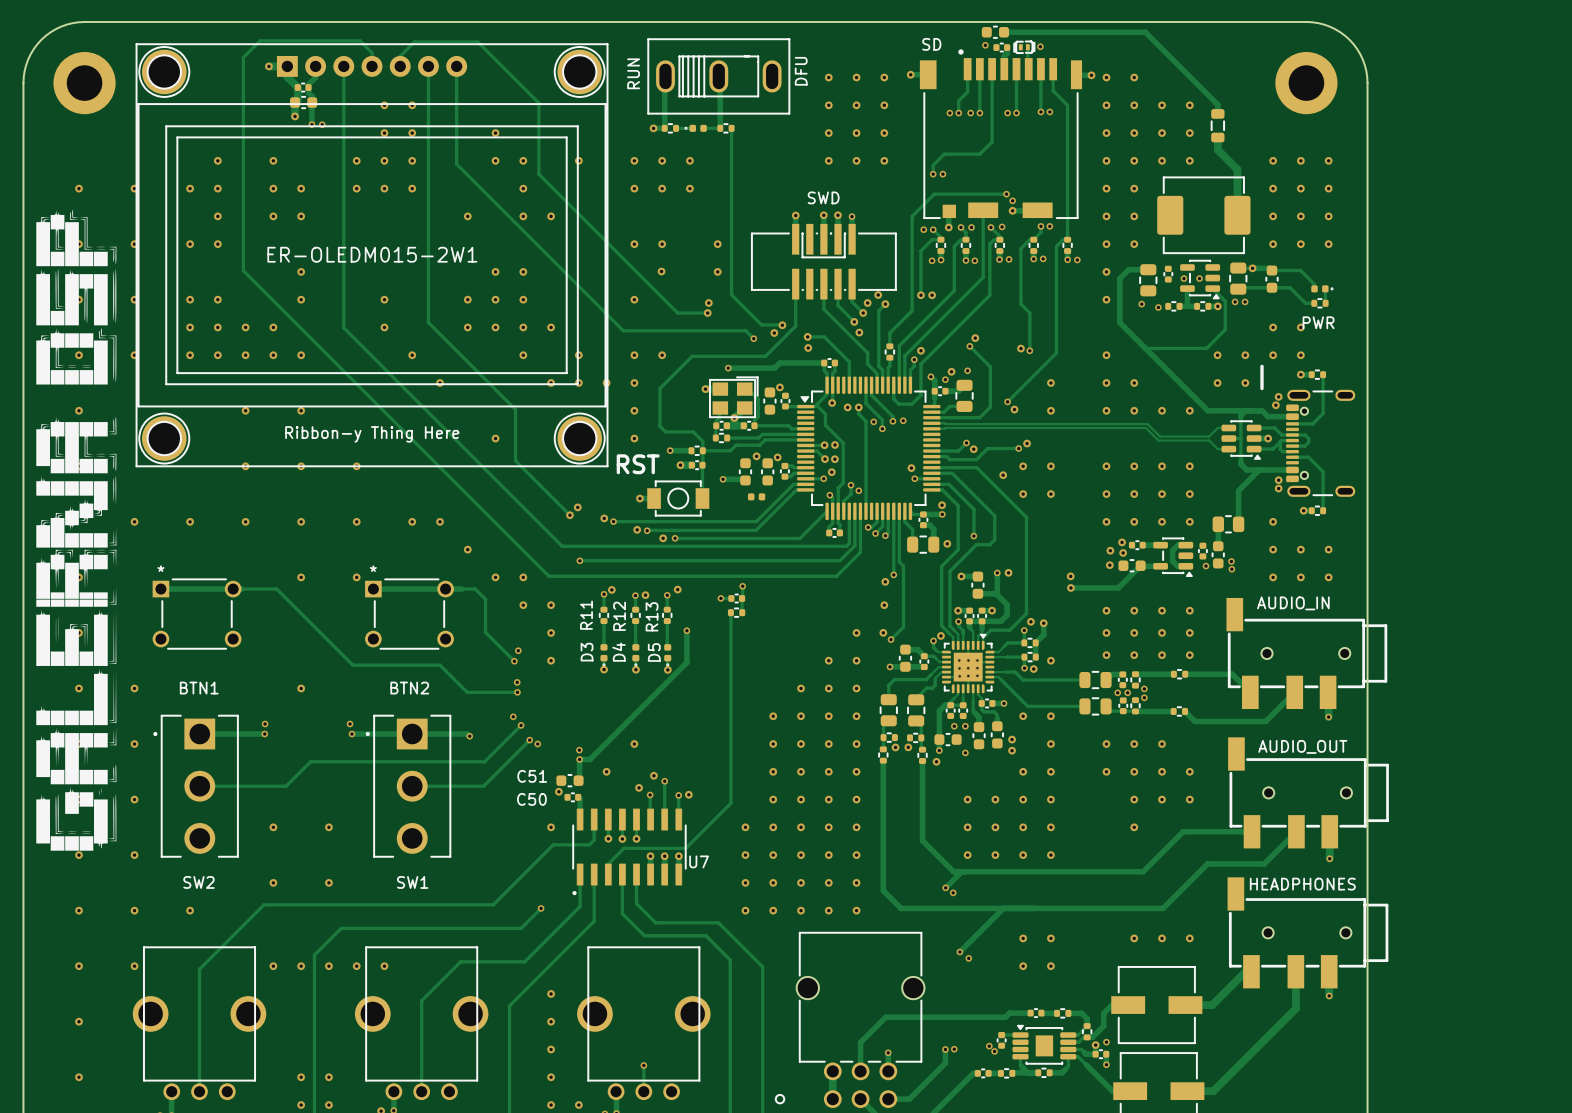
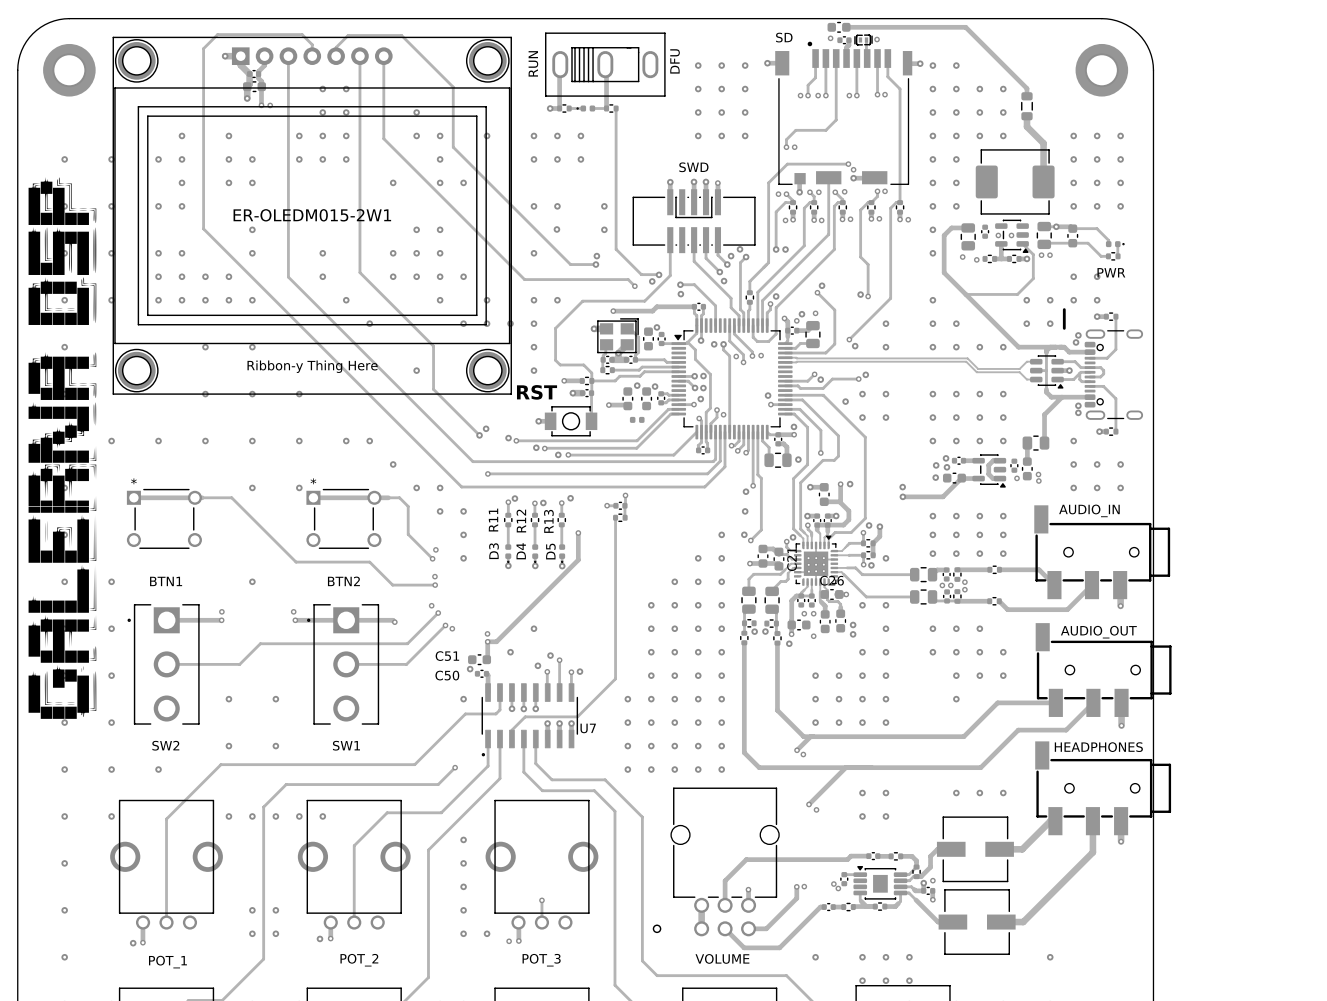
part: (924, 661) -> none
C21: none -> (778, 559)
part: (987, 703) -> none
C26: none -> (831, 594)

